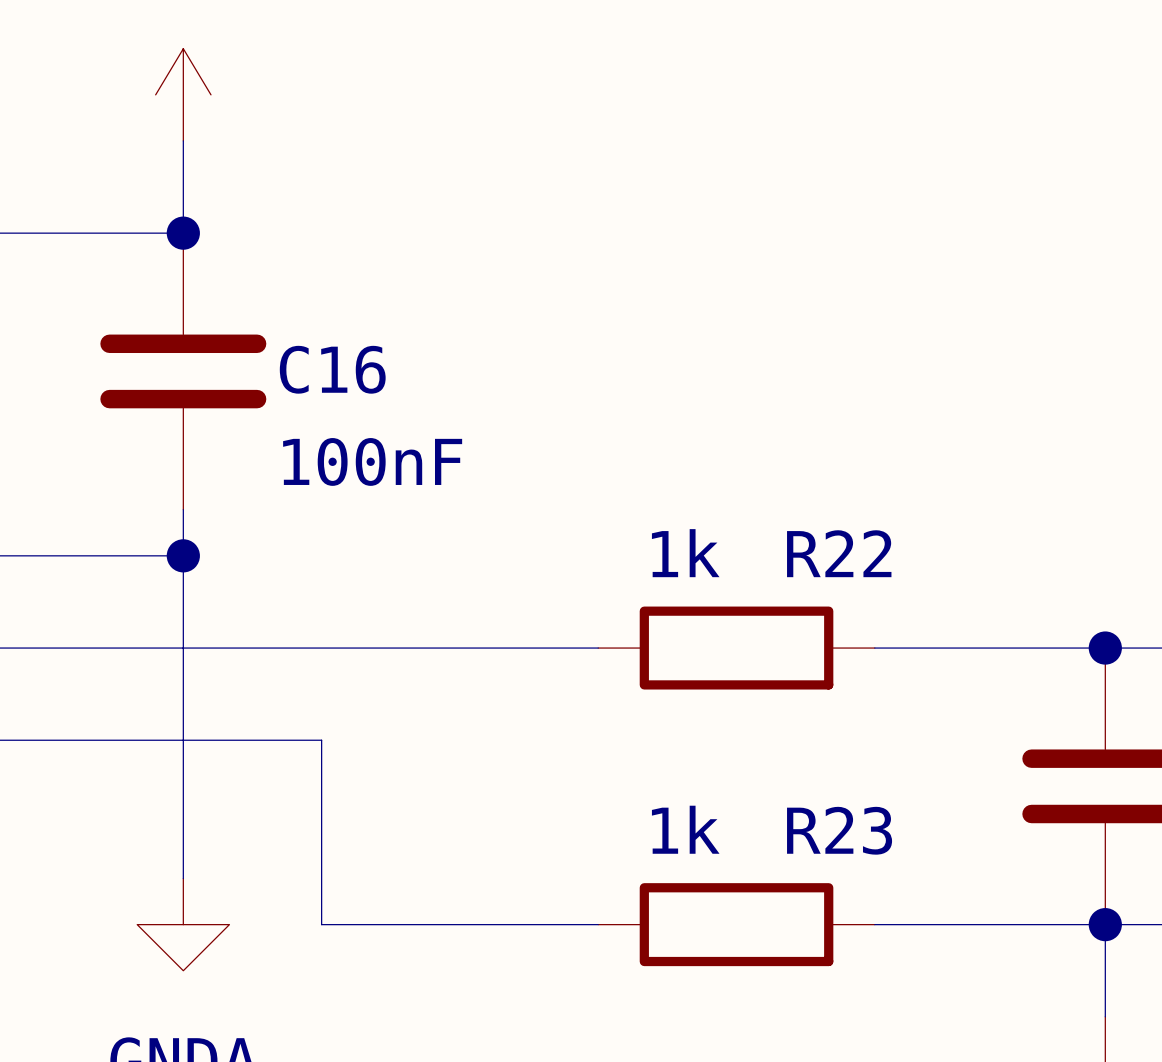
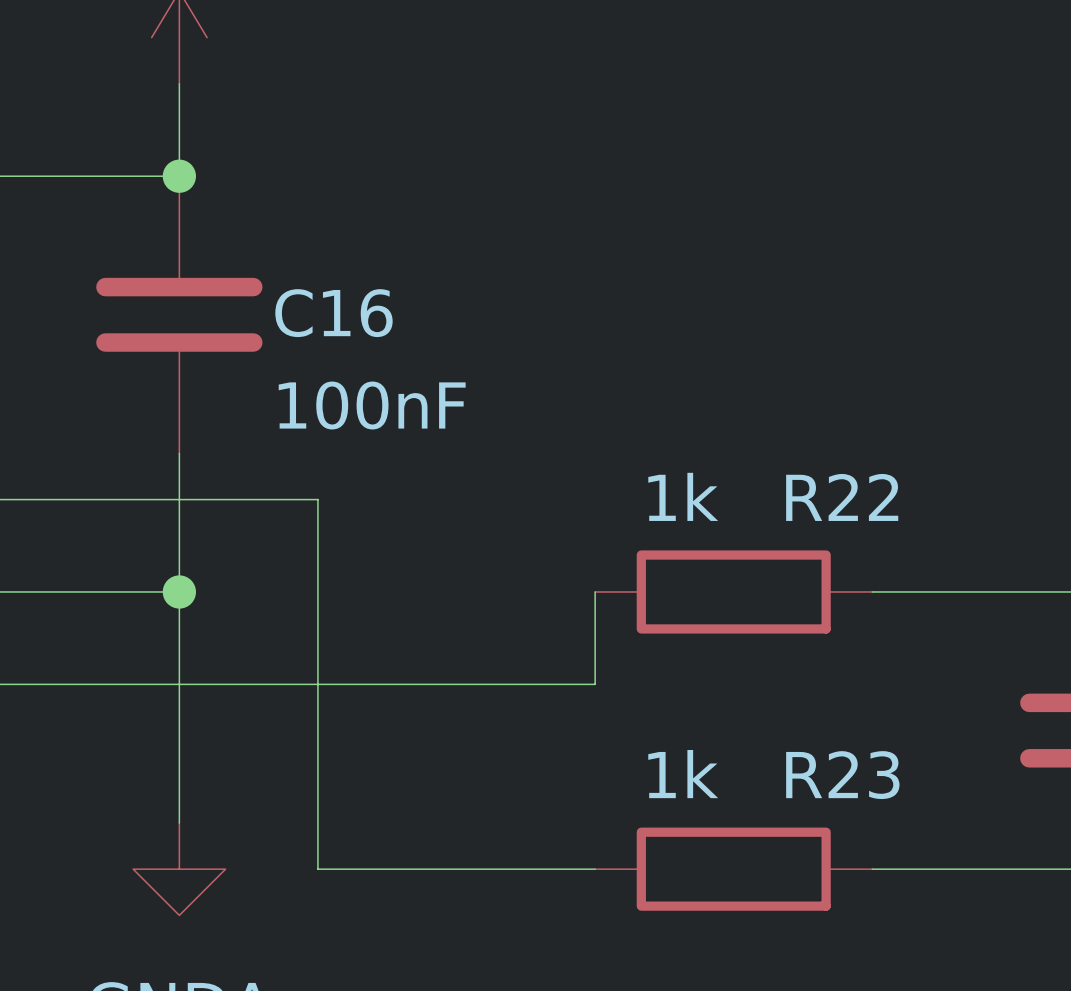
junction position: (183, 555) -> (179, 591)
wire: (183, 648) (598, 648) -> (179, 499) (317, 499) (317, 684) (595, 684) (595, 591)

